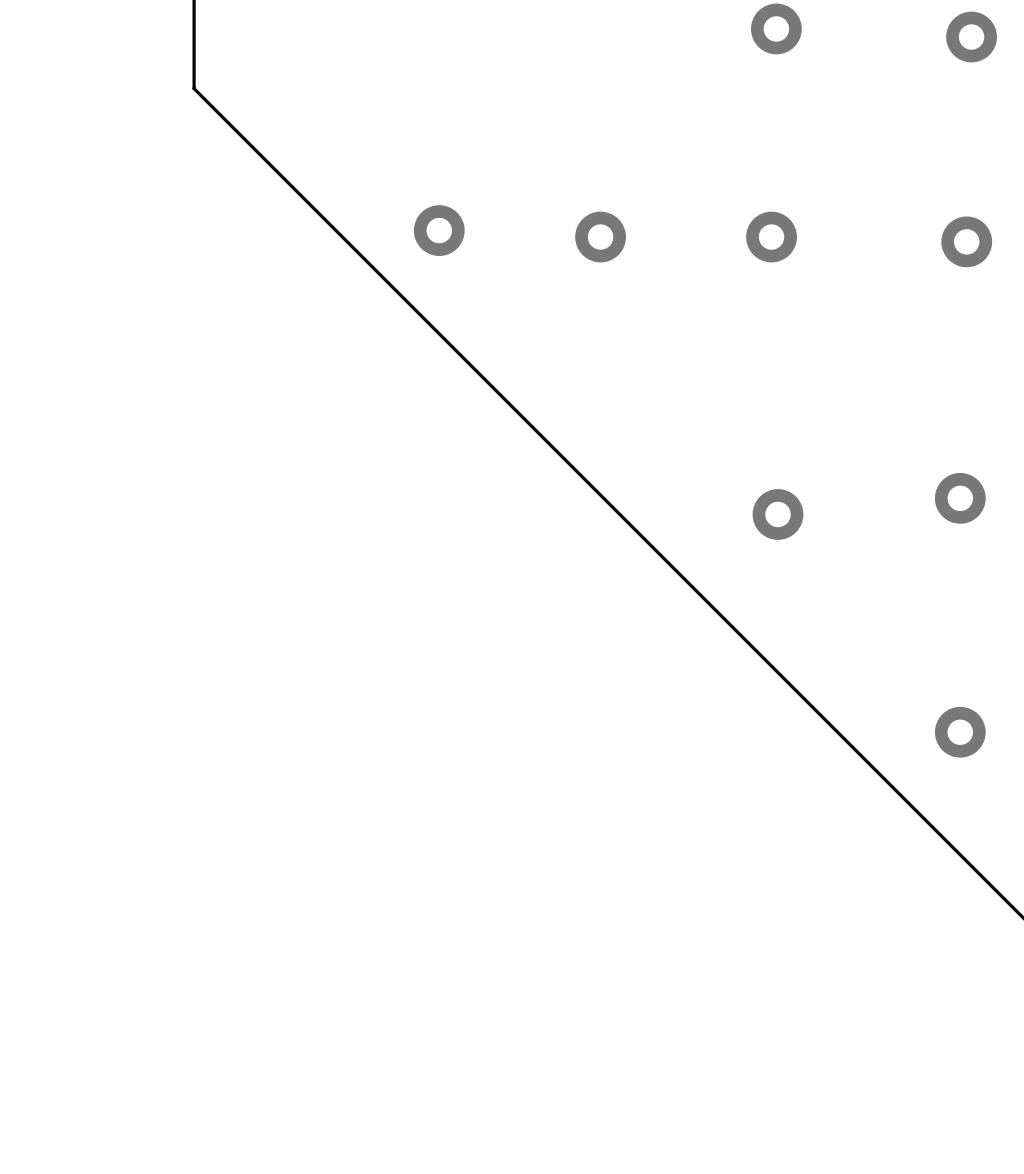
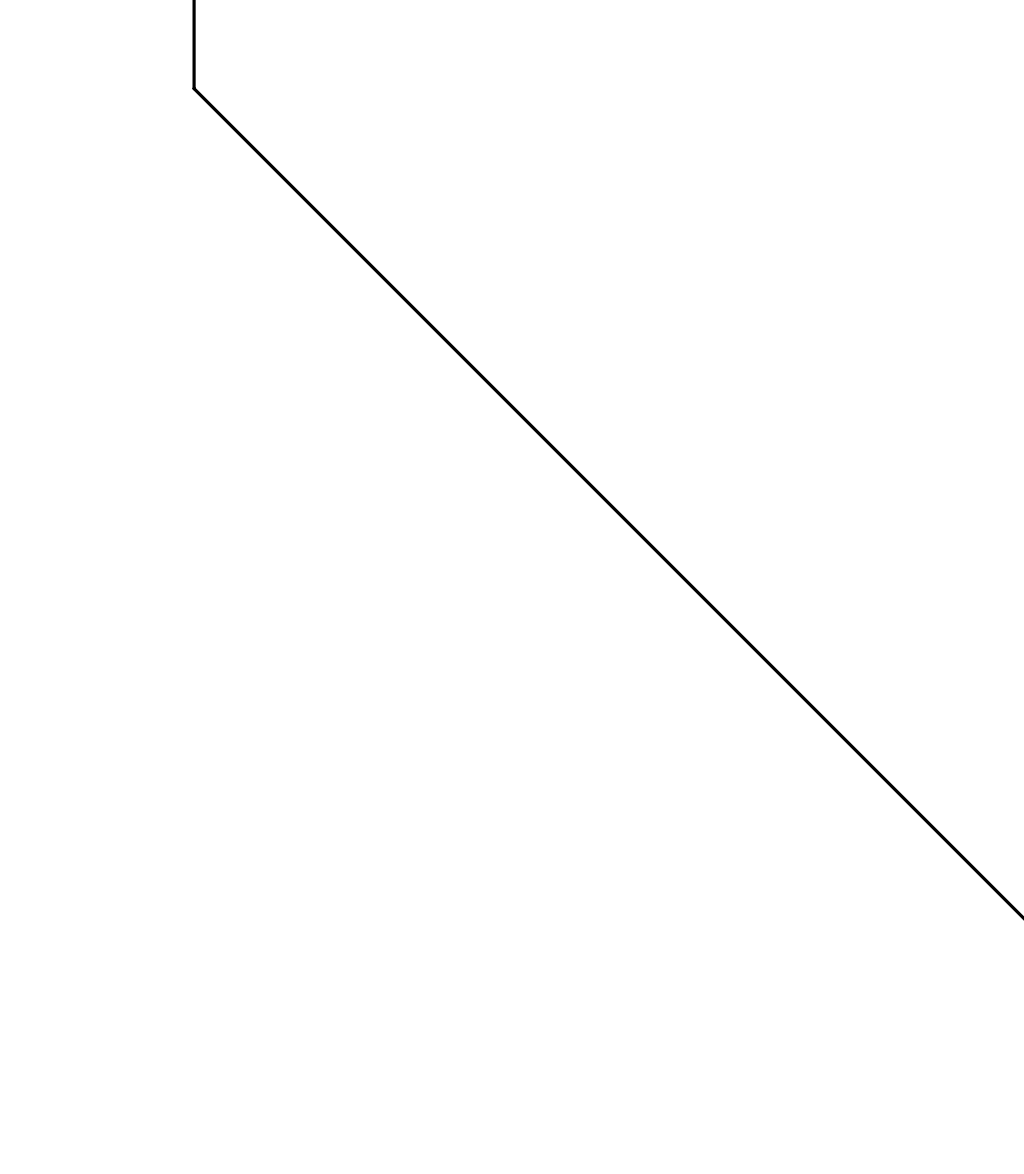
via: (776, 28) -> none
via: (971, 37) -> none
via: (439, 230) -> none
via: (600, 237) -> none
via: (771, 237) -> none
via: (966, 241) -> none
via: (960, 498) -> none
via: (778, 514) -> none
via: (960, 732) -> none

